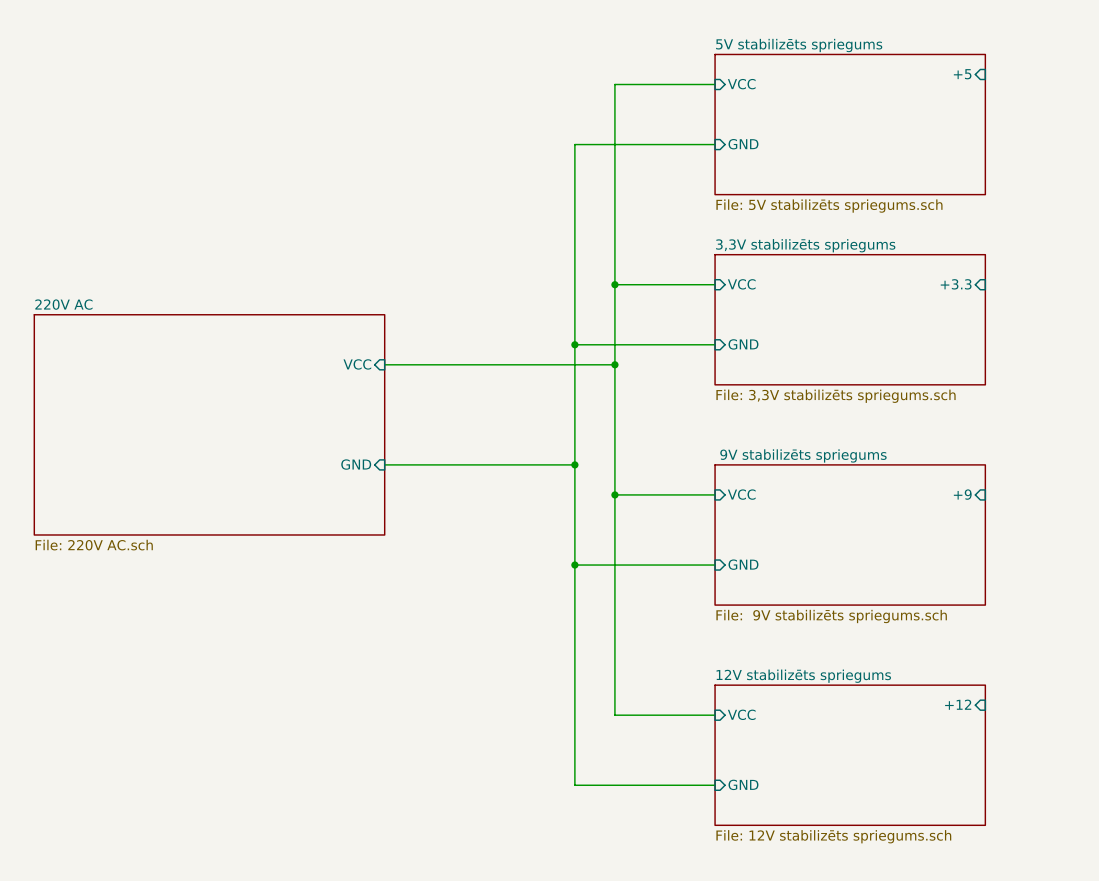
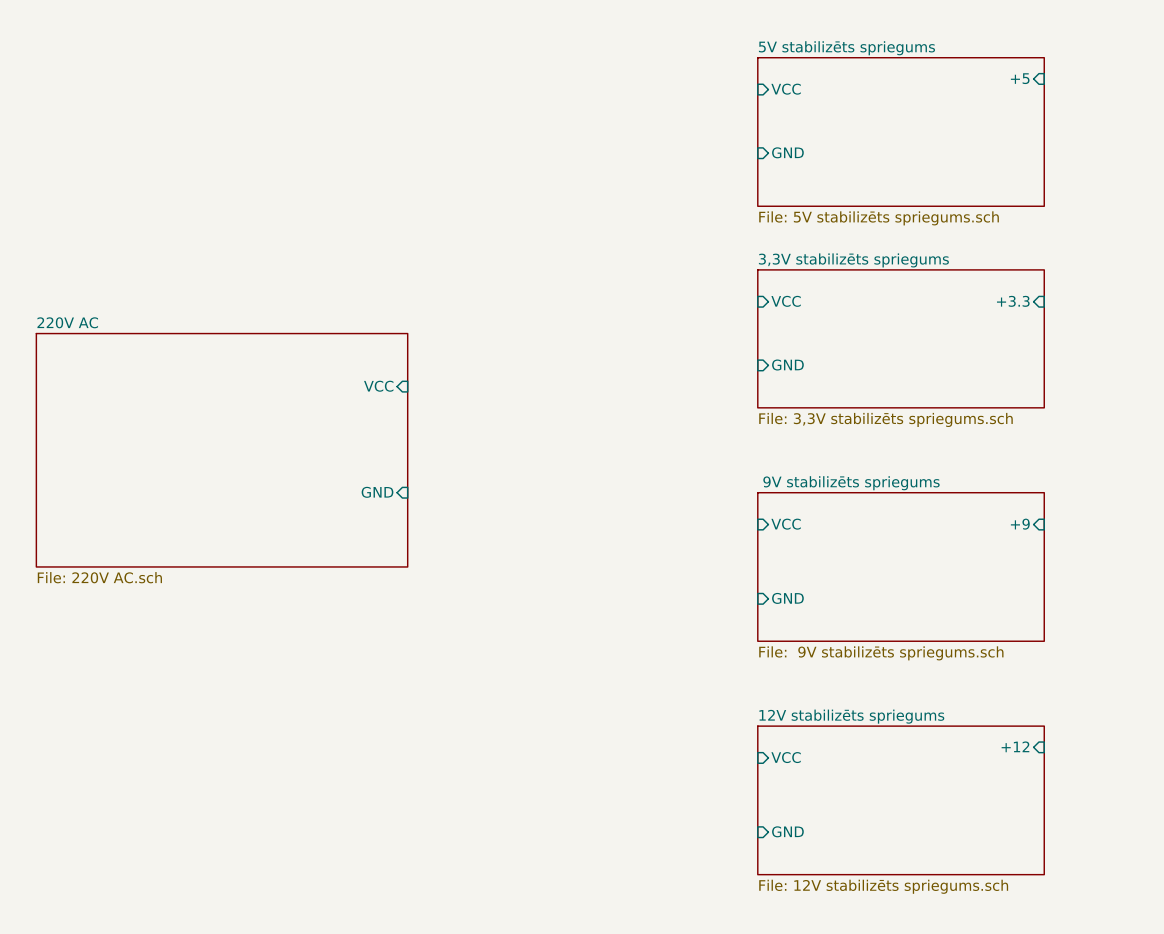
wire: (715, 84) (614, 84) (614, 715) (715, 715) -> none
wire: (715, 144) (574, 144) (574, 785) (715, 785) -> none
wire: (614, 284) (715, 284) -> none
junction: (614, 284) -> none
wire: (574, 344) (715, 344) -> none
junction: (574, 344) -> none
wire: (384, 364) (614, 364) -> none
junction: (614, 364) -> none
wire: (384, 464) (574, 464) -> none
junction: (574, 464) -> none
wire: (614, 494) (715, 494) -> none
junction: (614, 494) -> none
wire: (574, 565) (715, 565) -> none
junction: (574, 565) -> none

